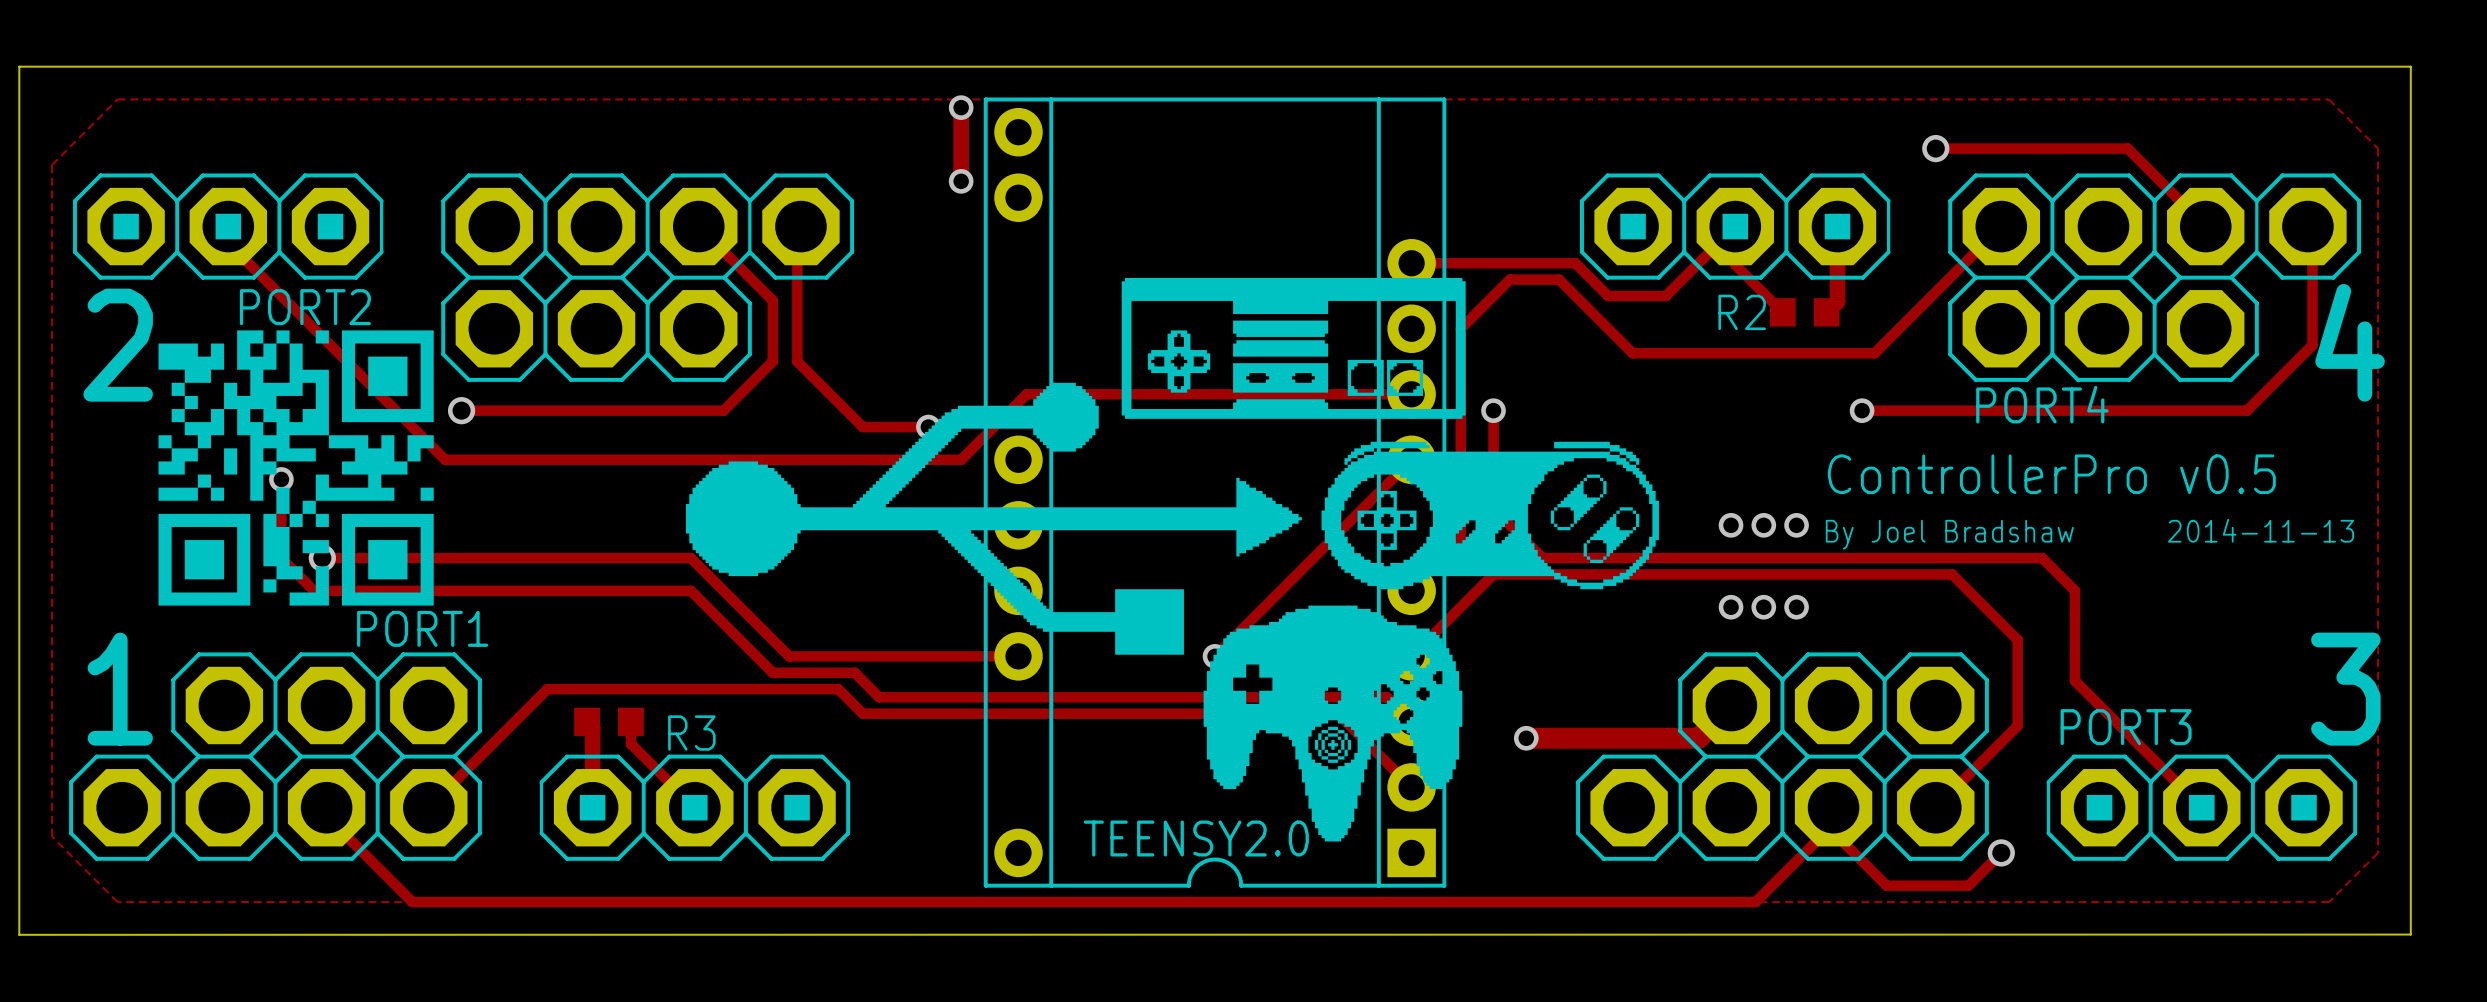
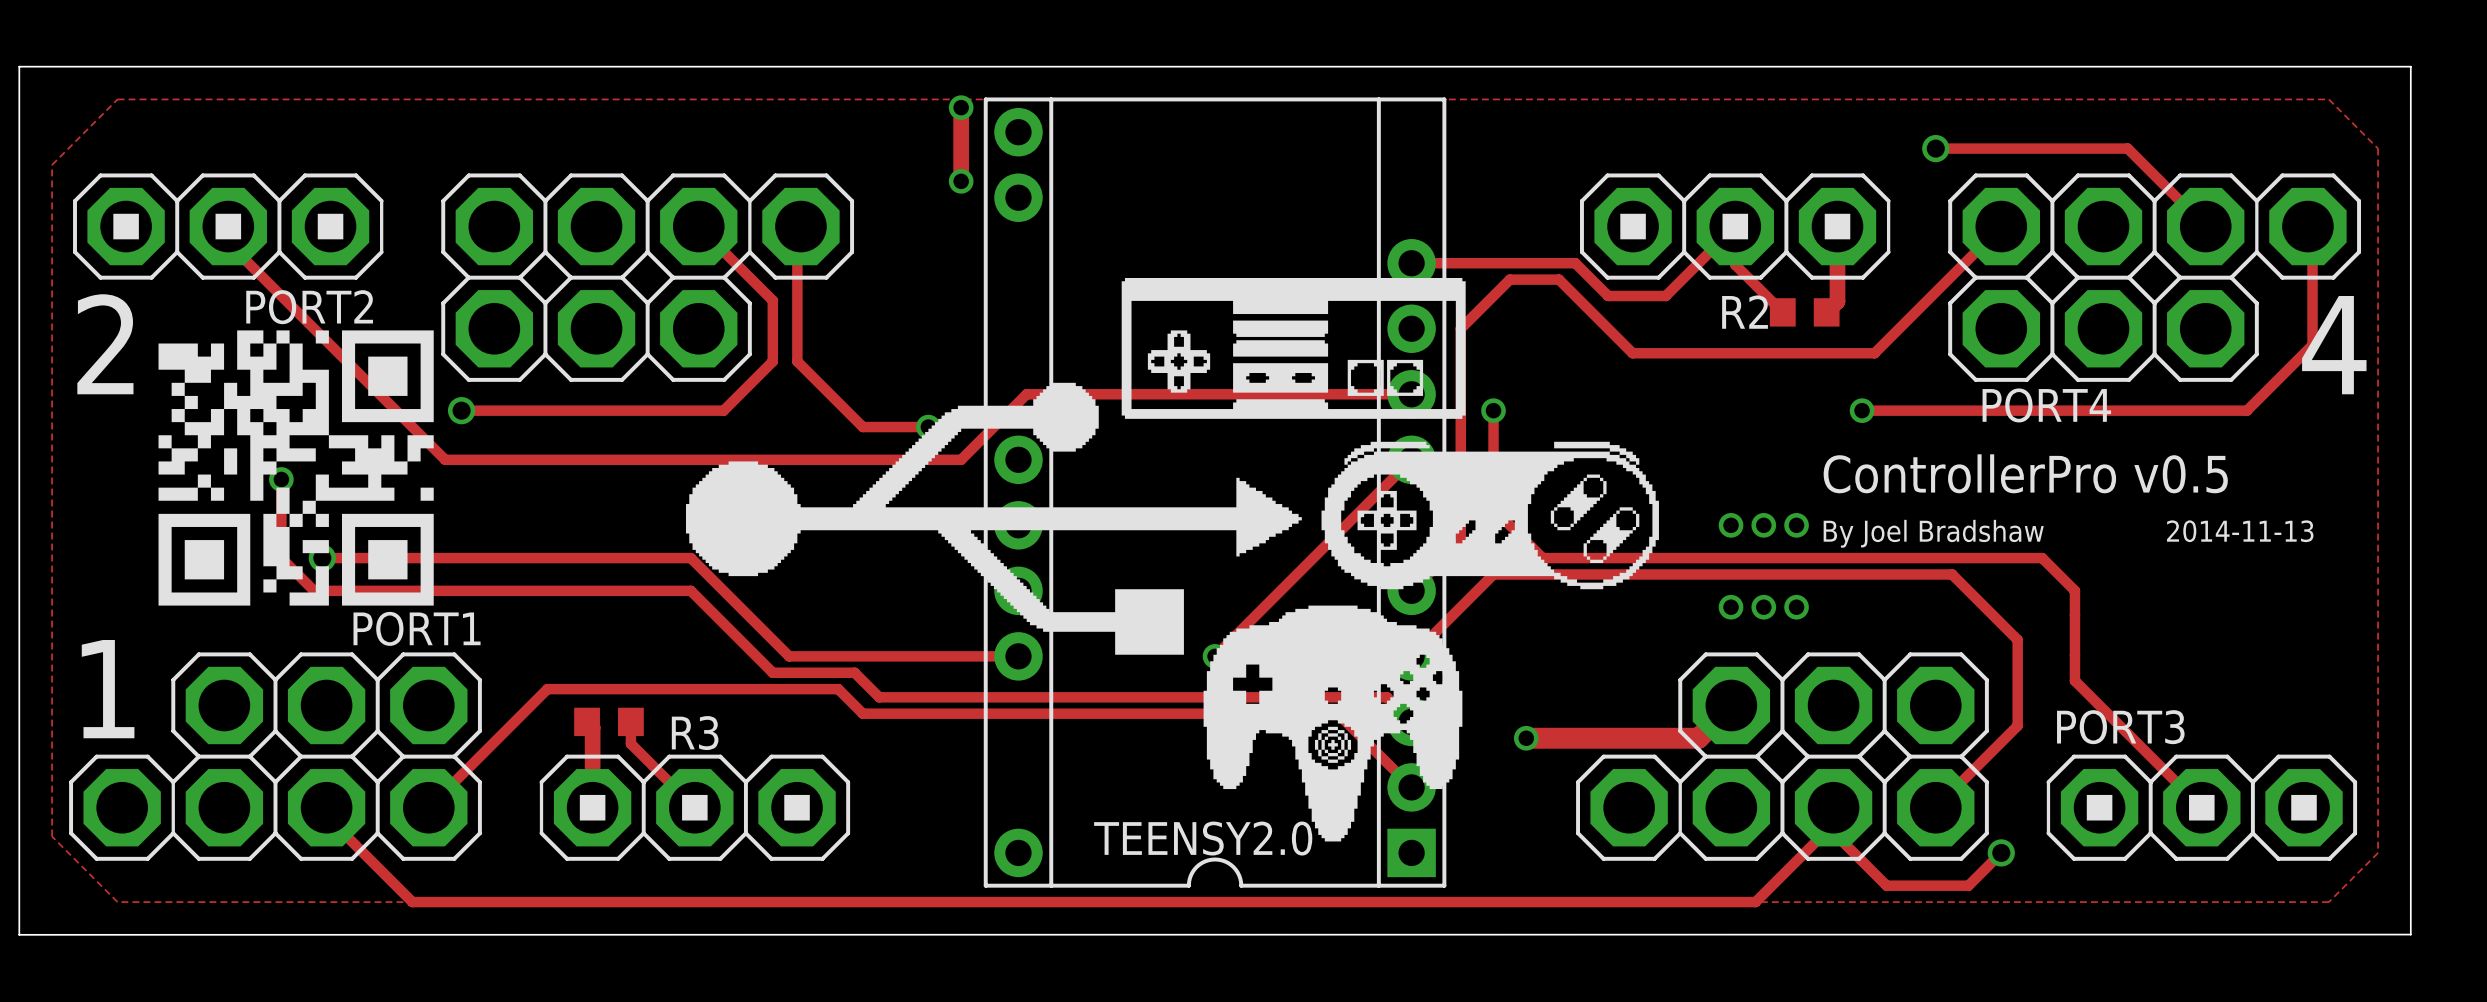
text: 3 (2345, 689) -> none

